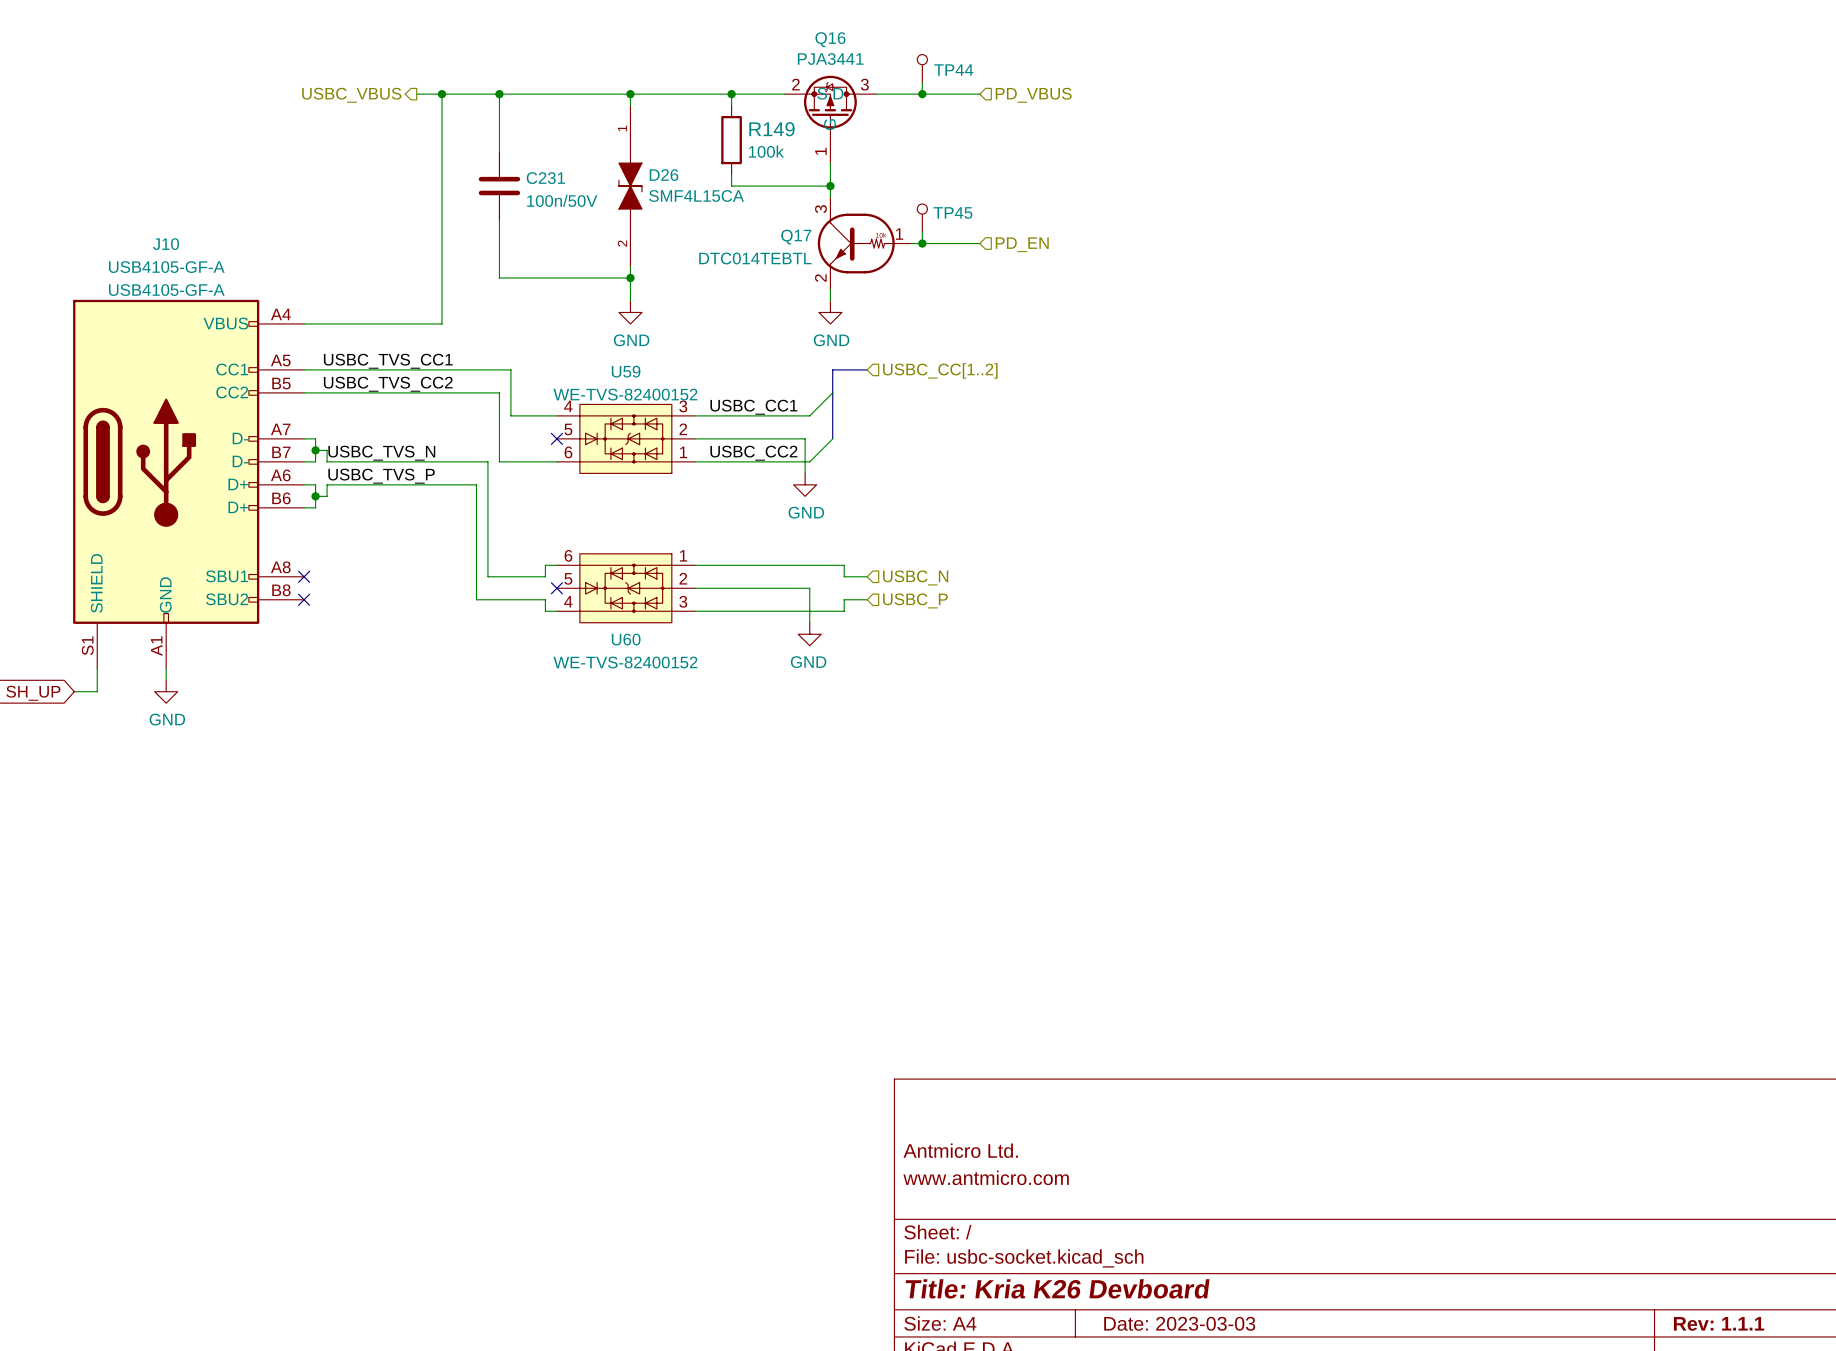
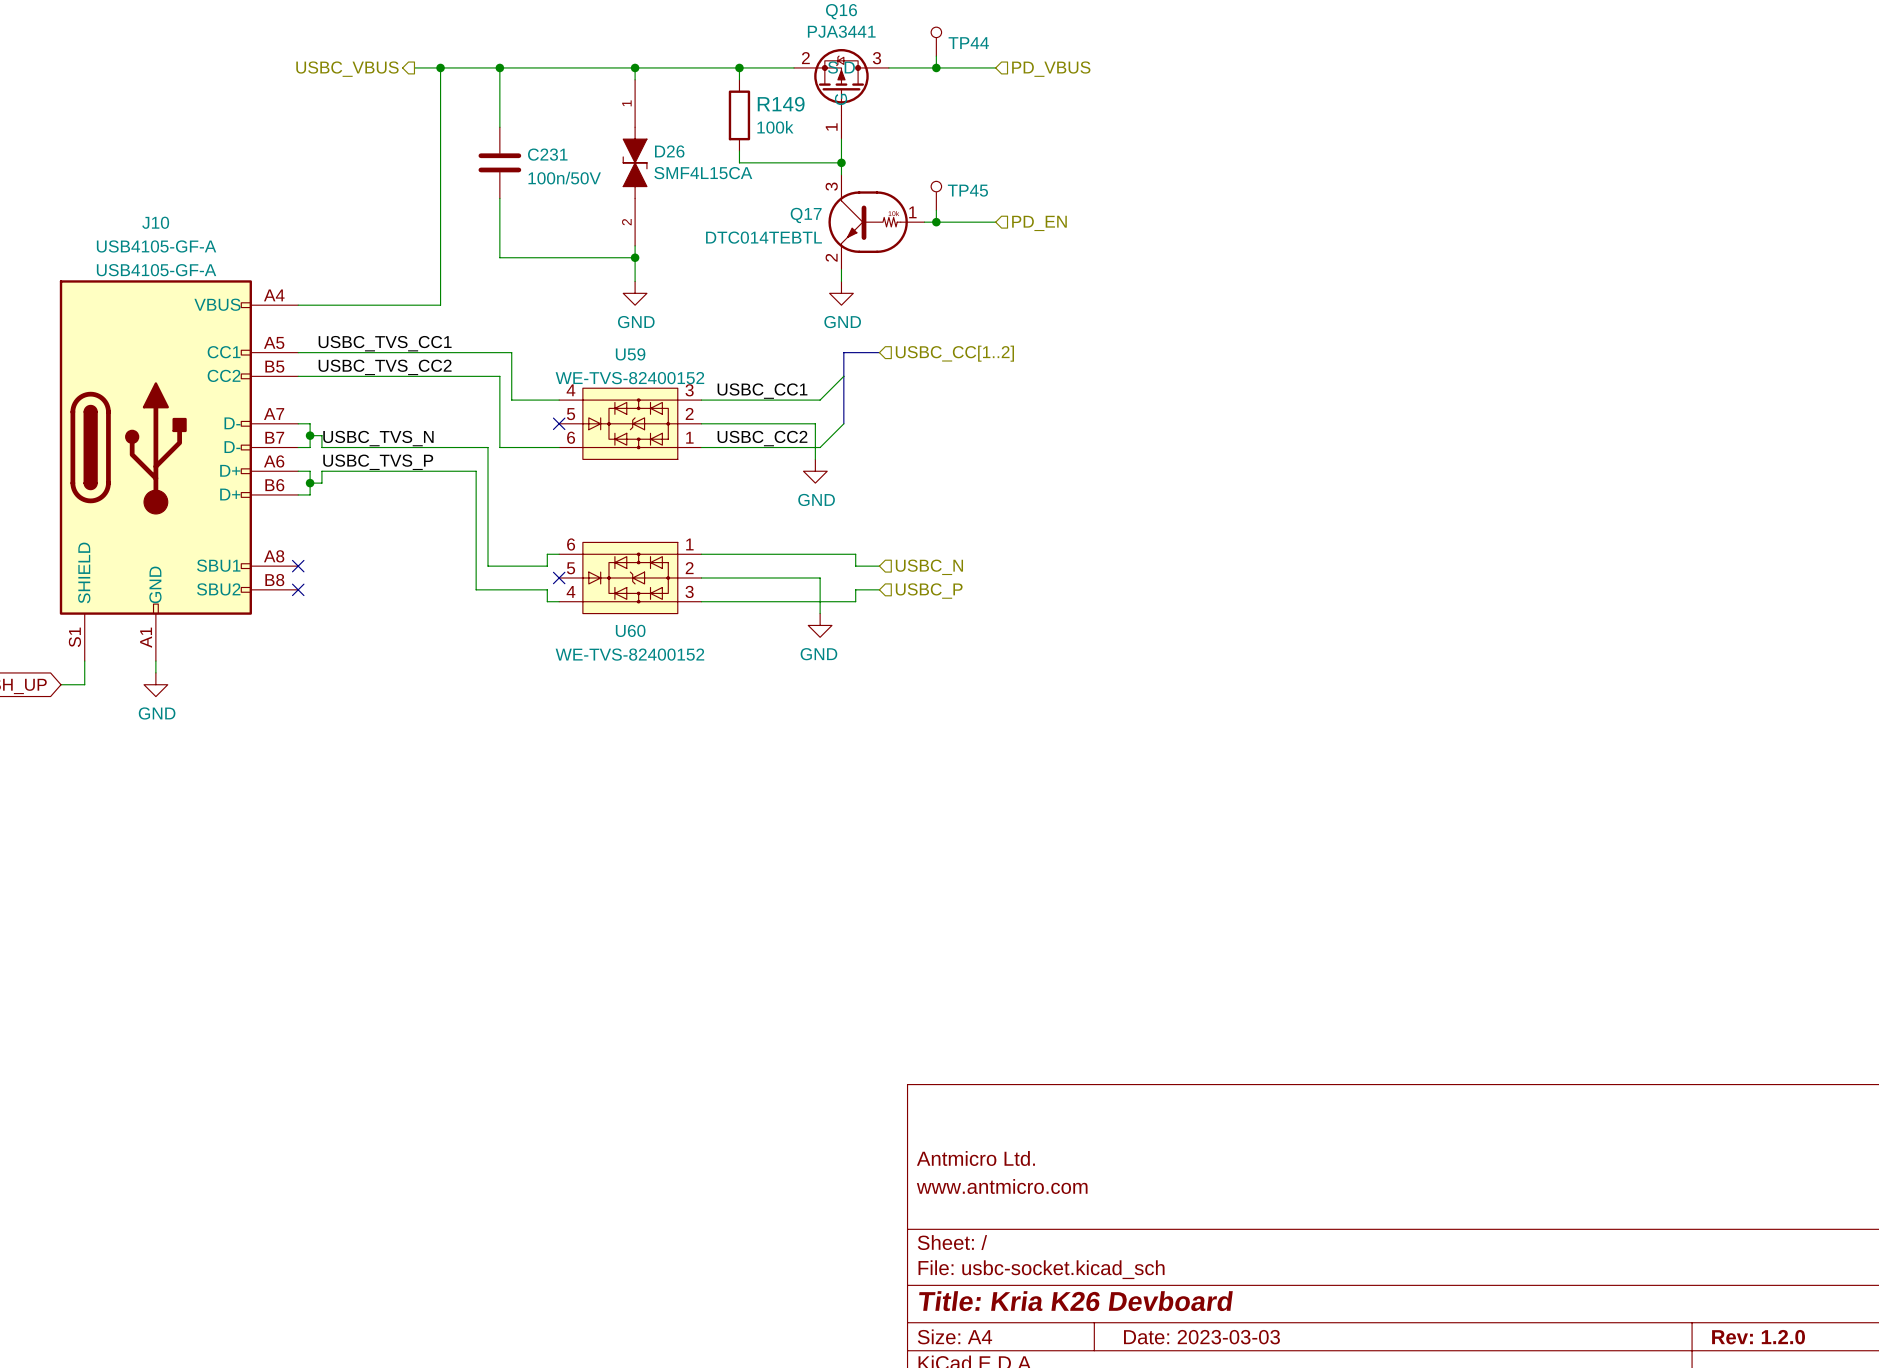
title block: Rev: 1.1.1 (1719, 1323) -> Rev: 1.2.0 (1758, 1337)

